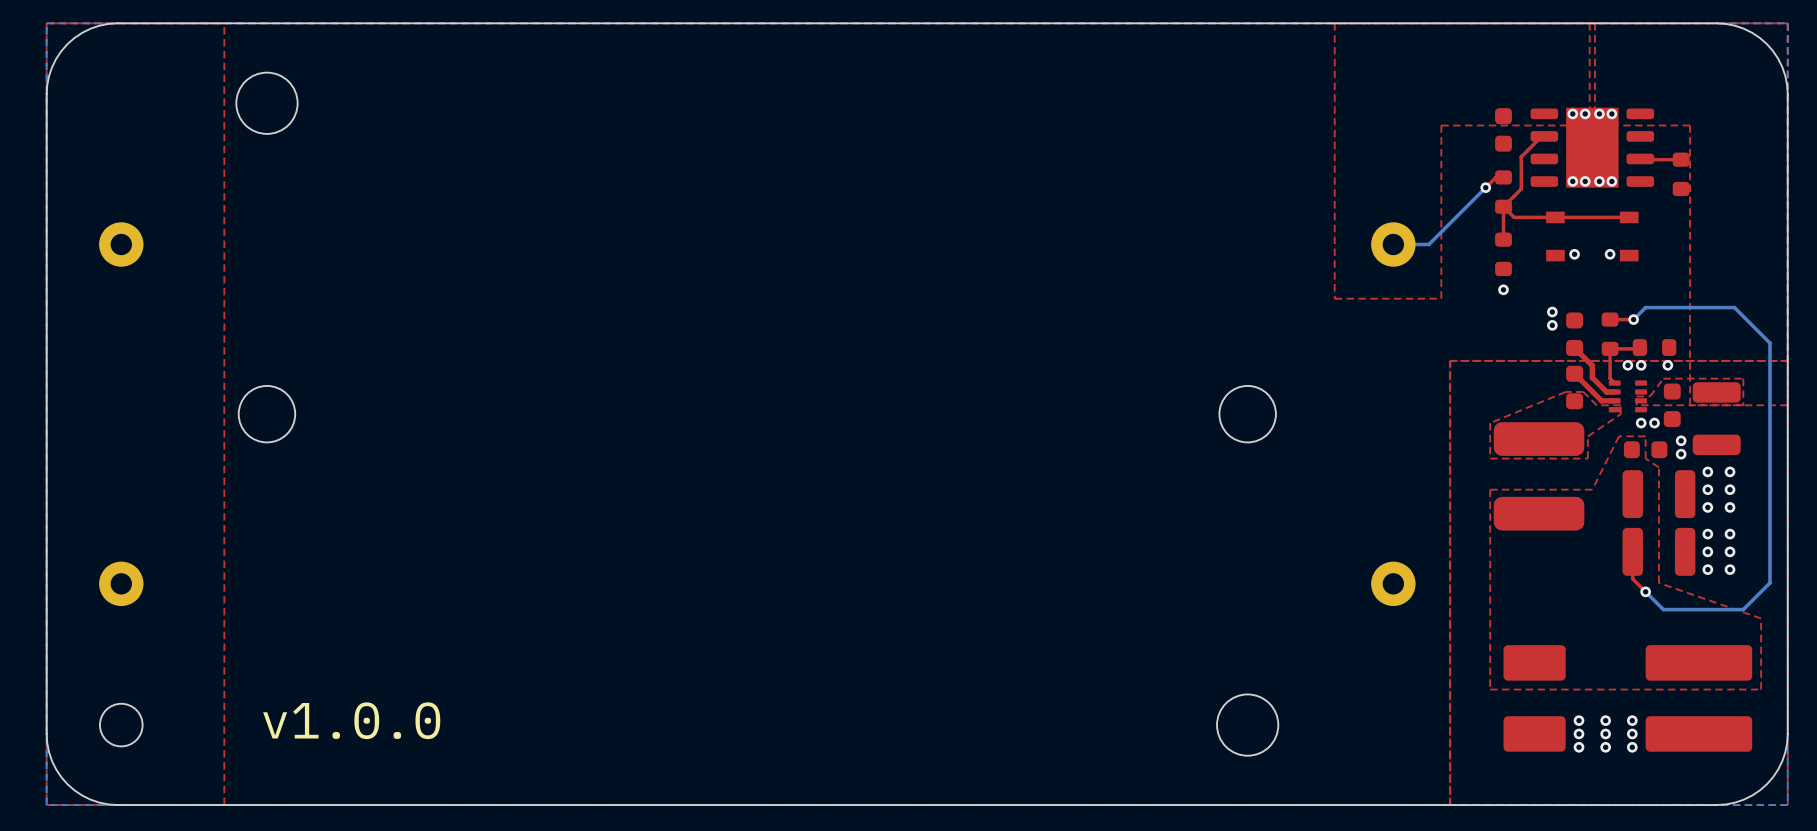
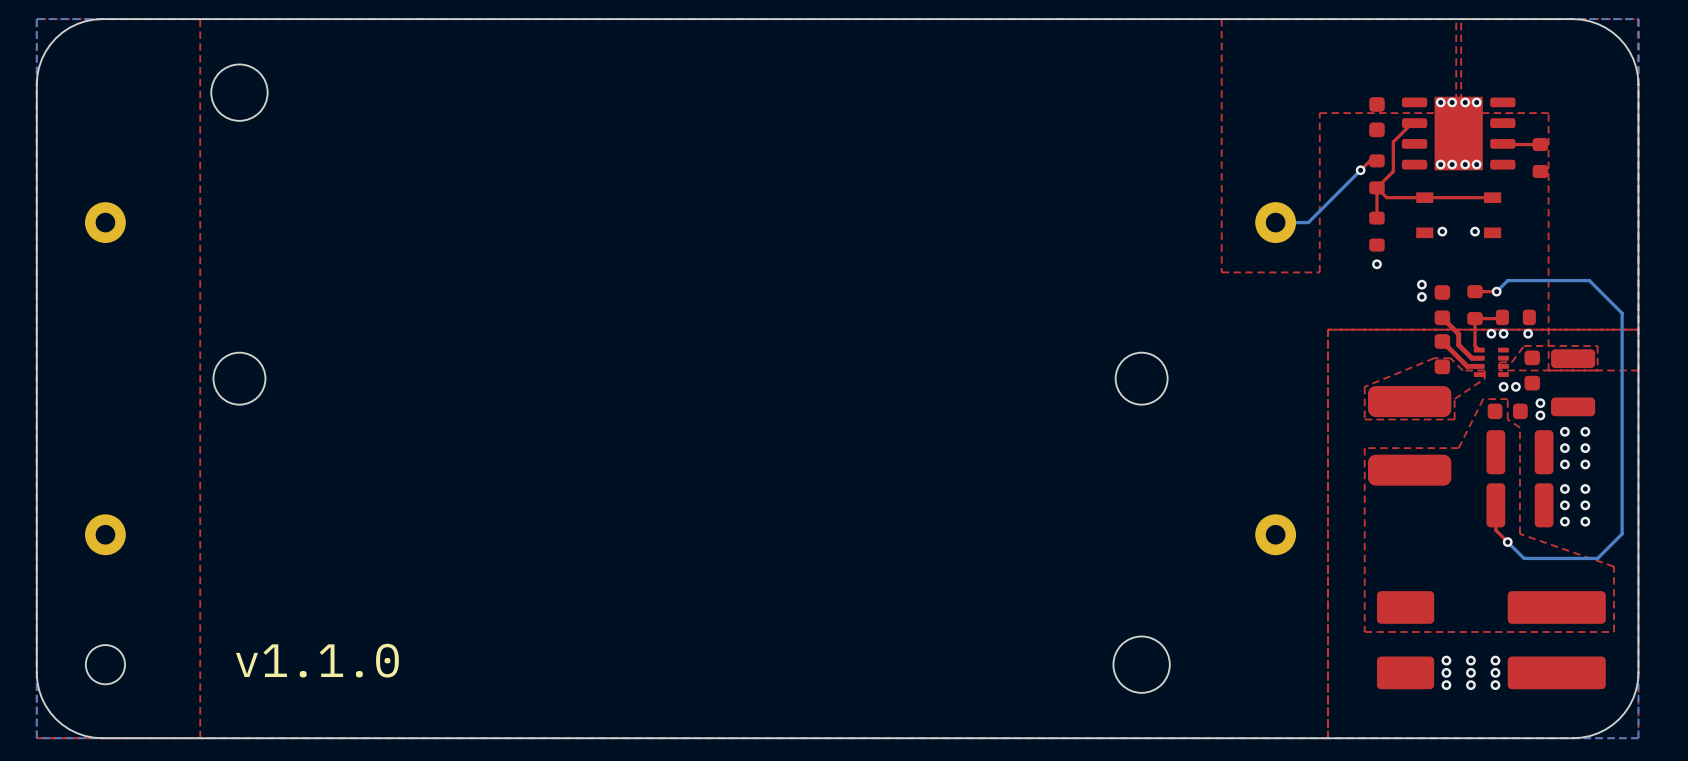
text: v1.0.0 (351, 720) -> v1.1.0 (317, 660)

